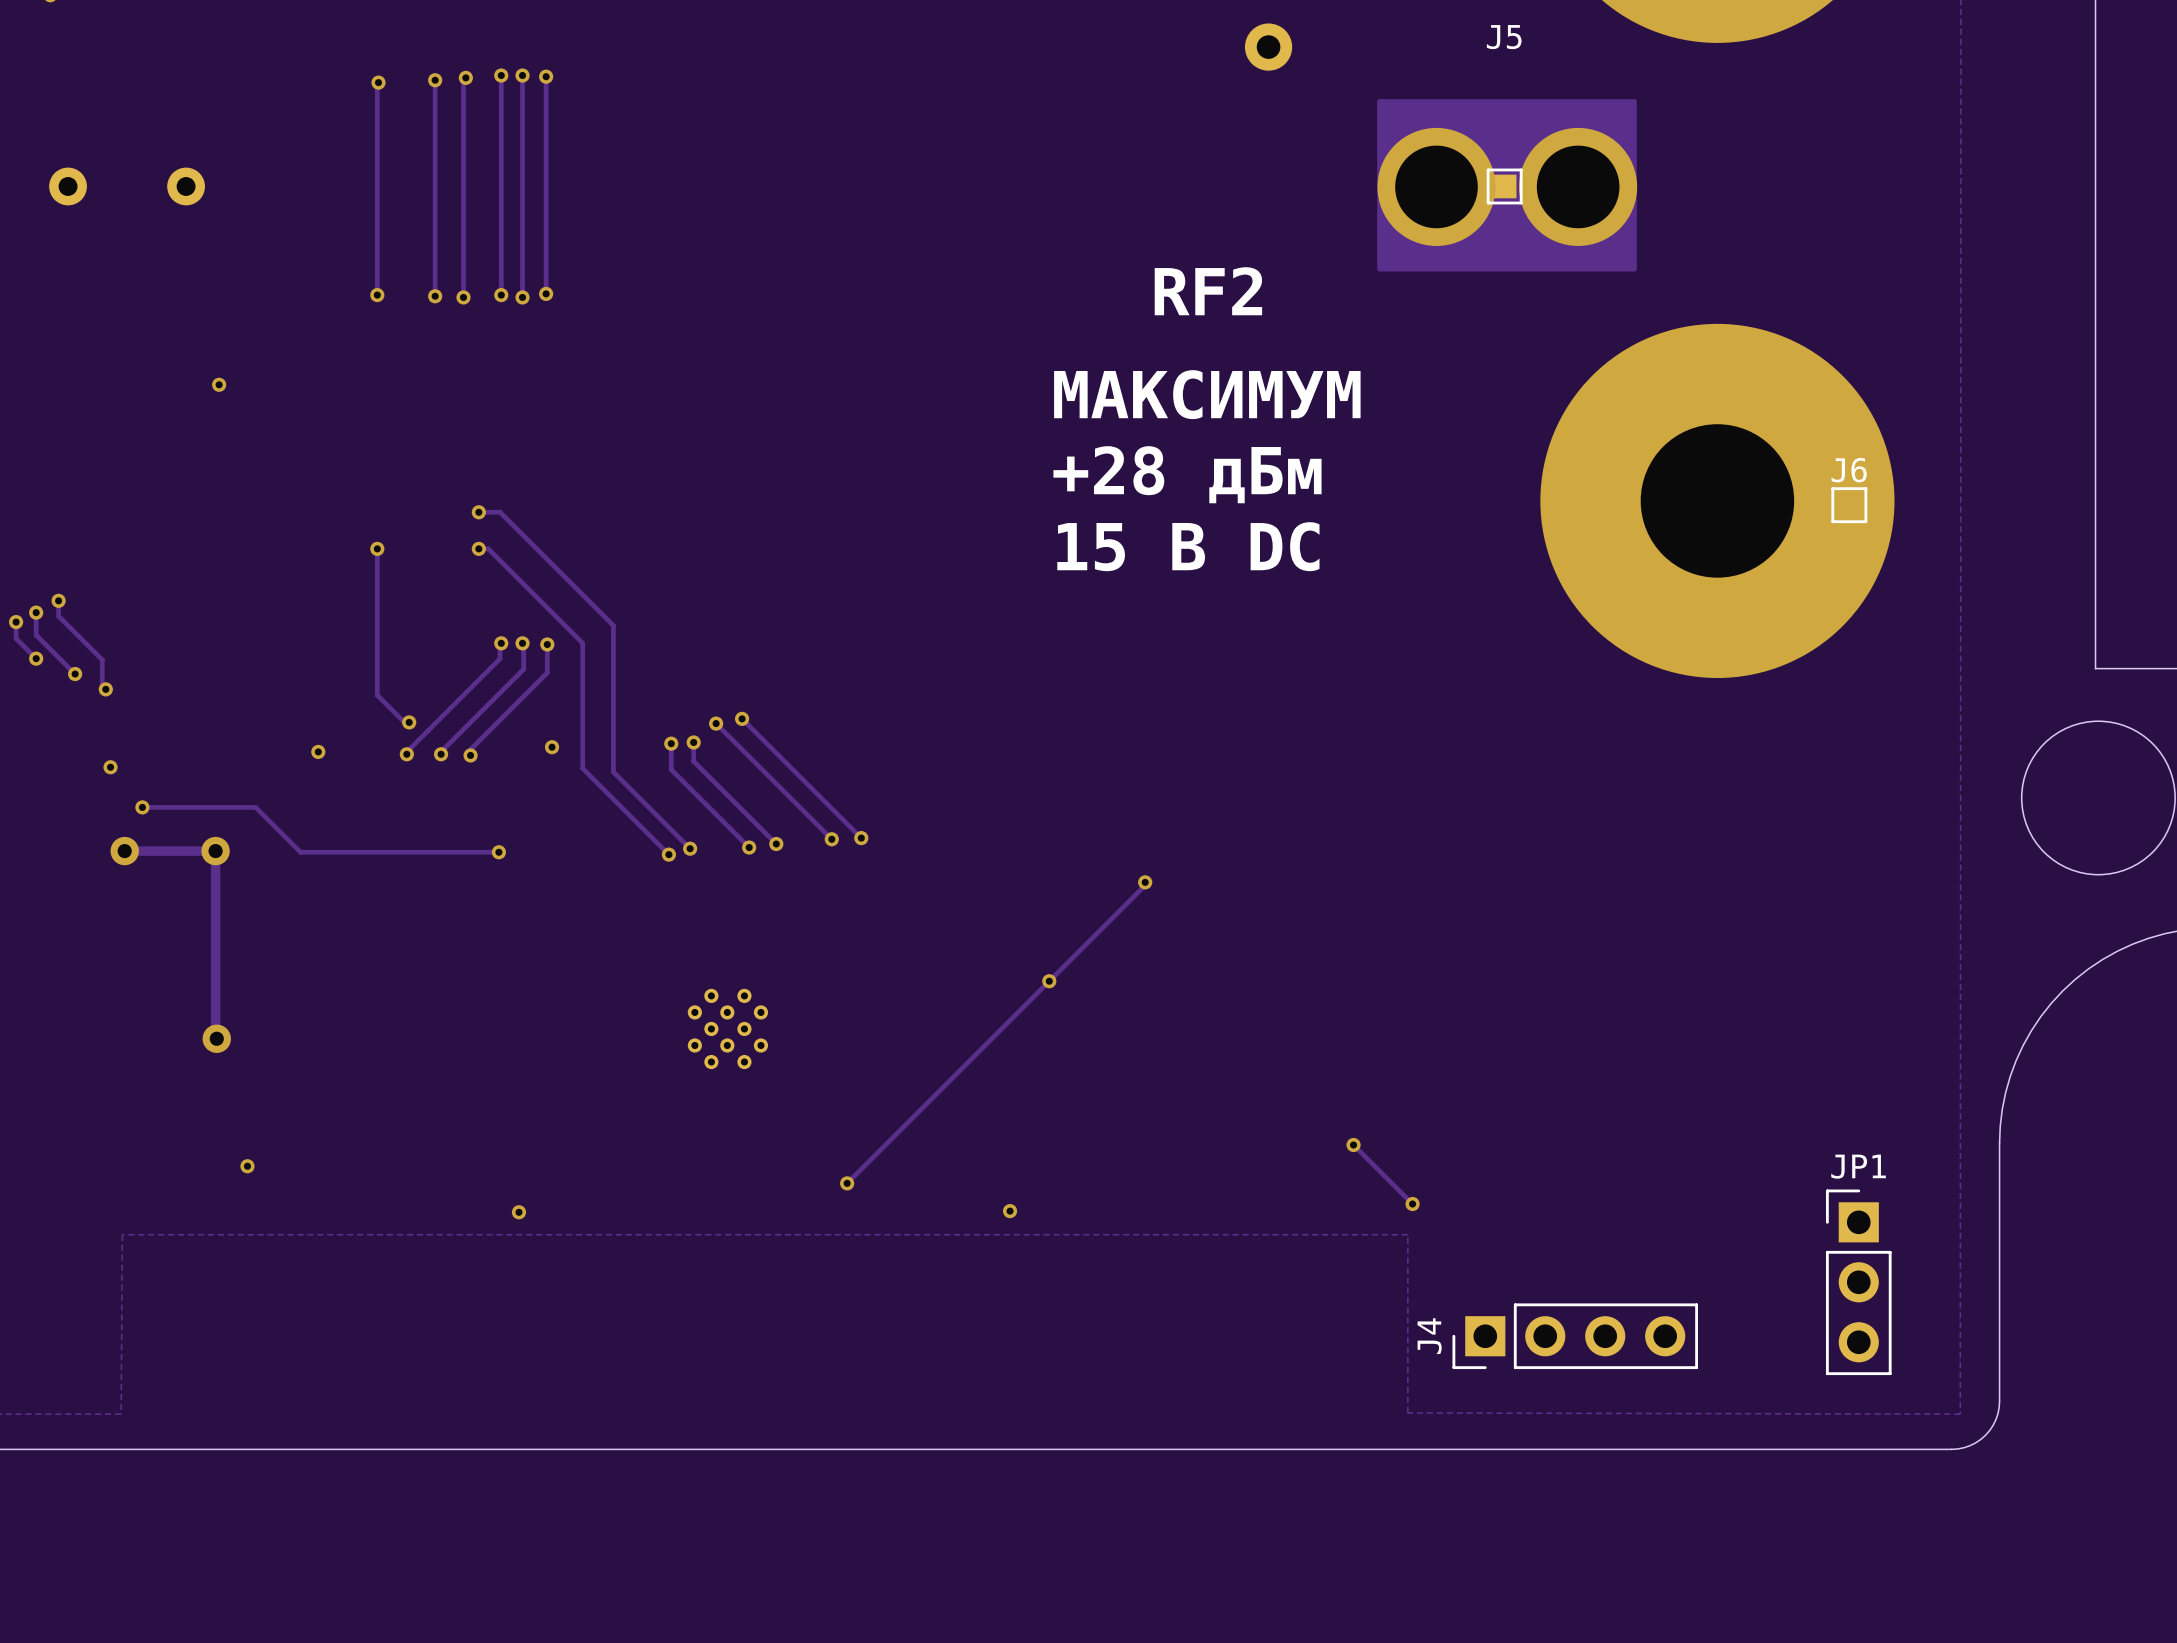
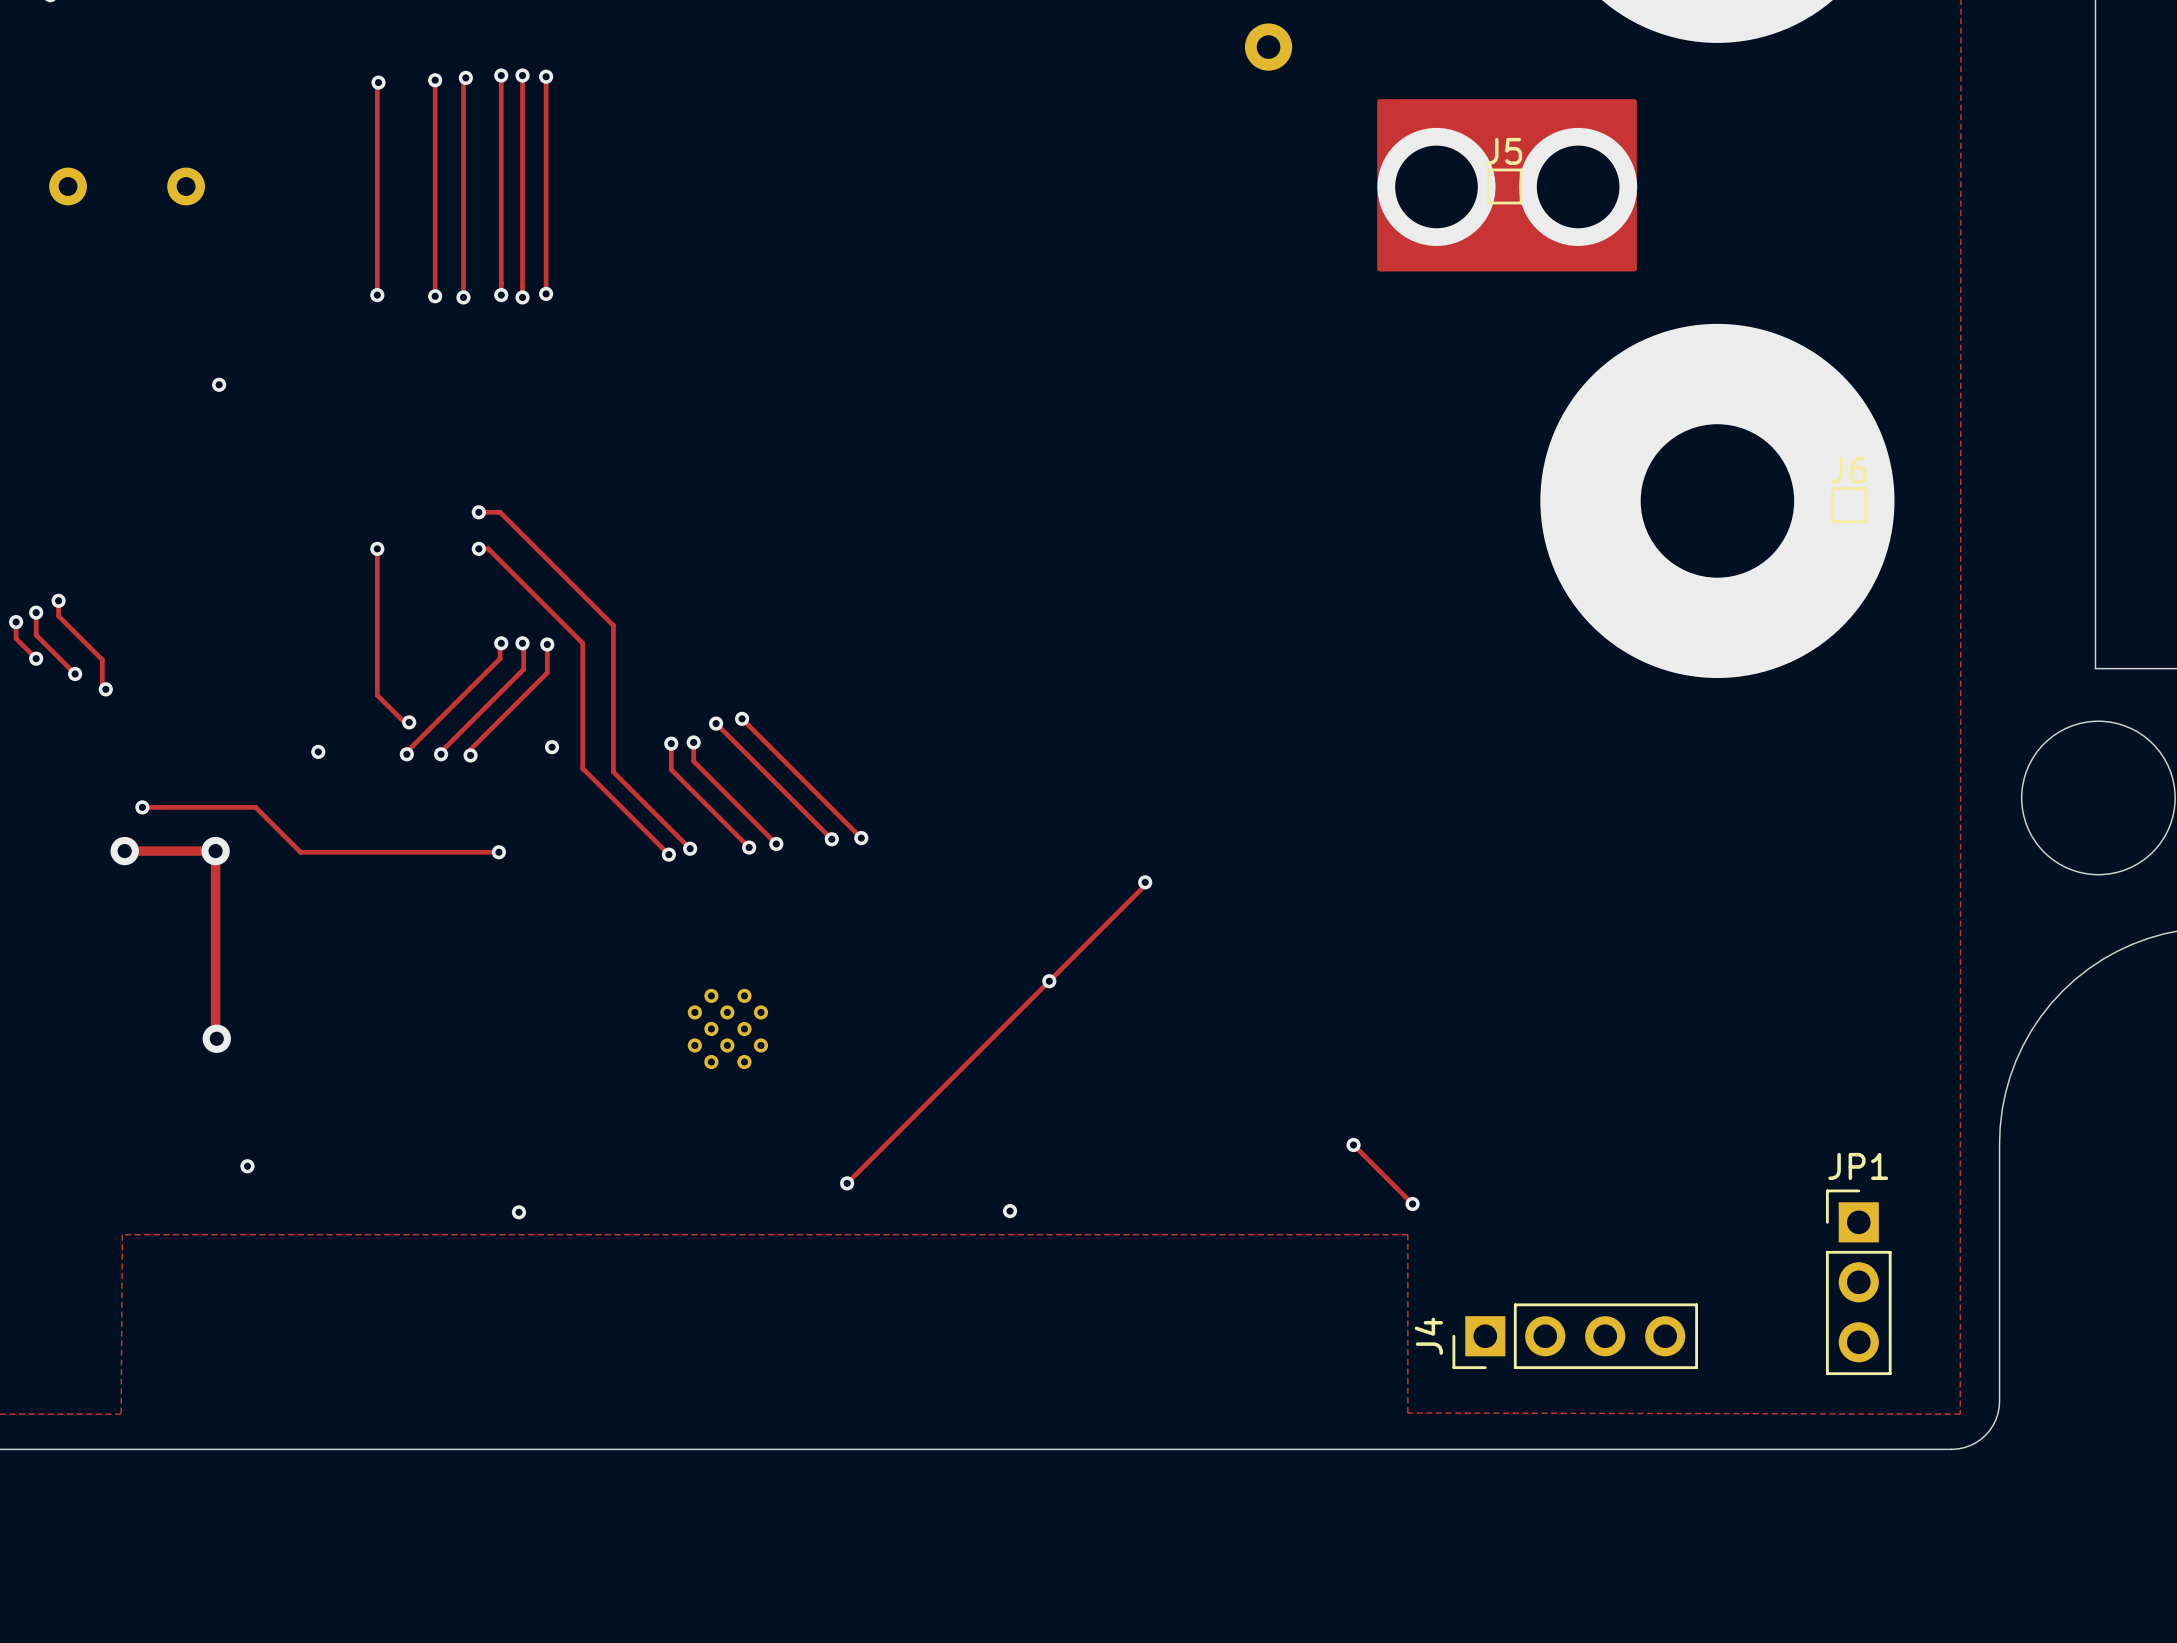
J5 name position: J5 (1504, 37) -> J5 (1504, 151)
text: RF2 (1208, 291) -> none
text: МАКСИМУМ (1207, 394) -> none
text: +28 дБм (1187, 474) -> none
text: 15 В DC (1188, 546) -> none
via: (110, 767) -> none

